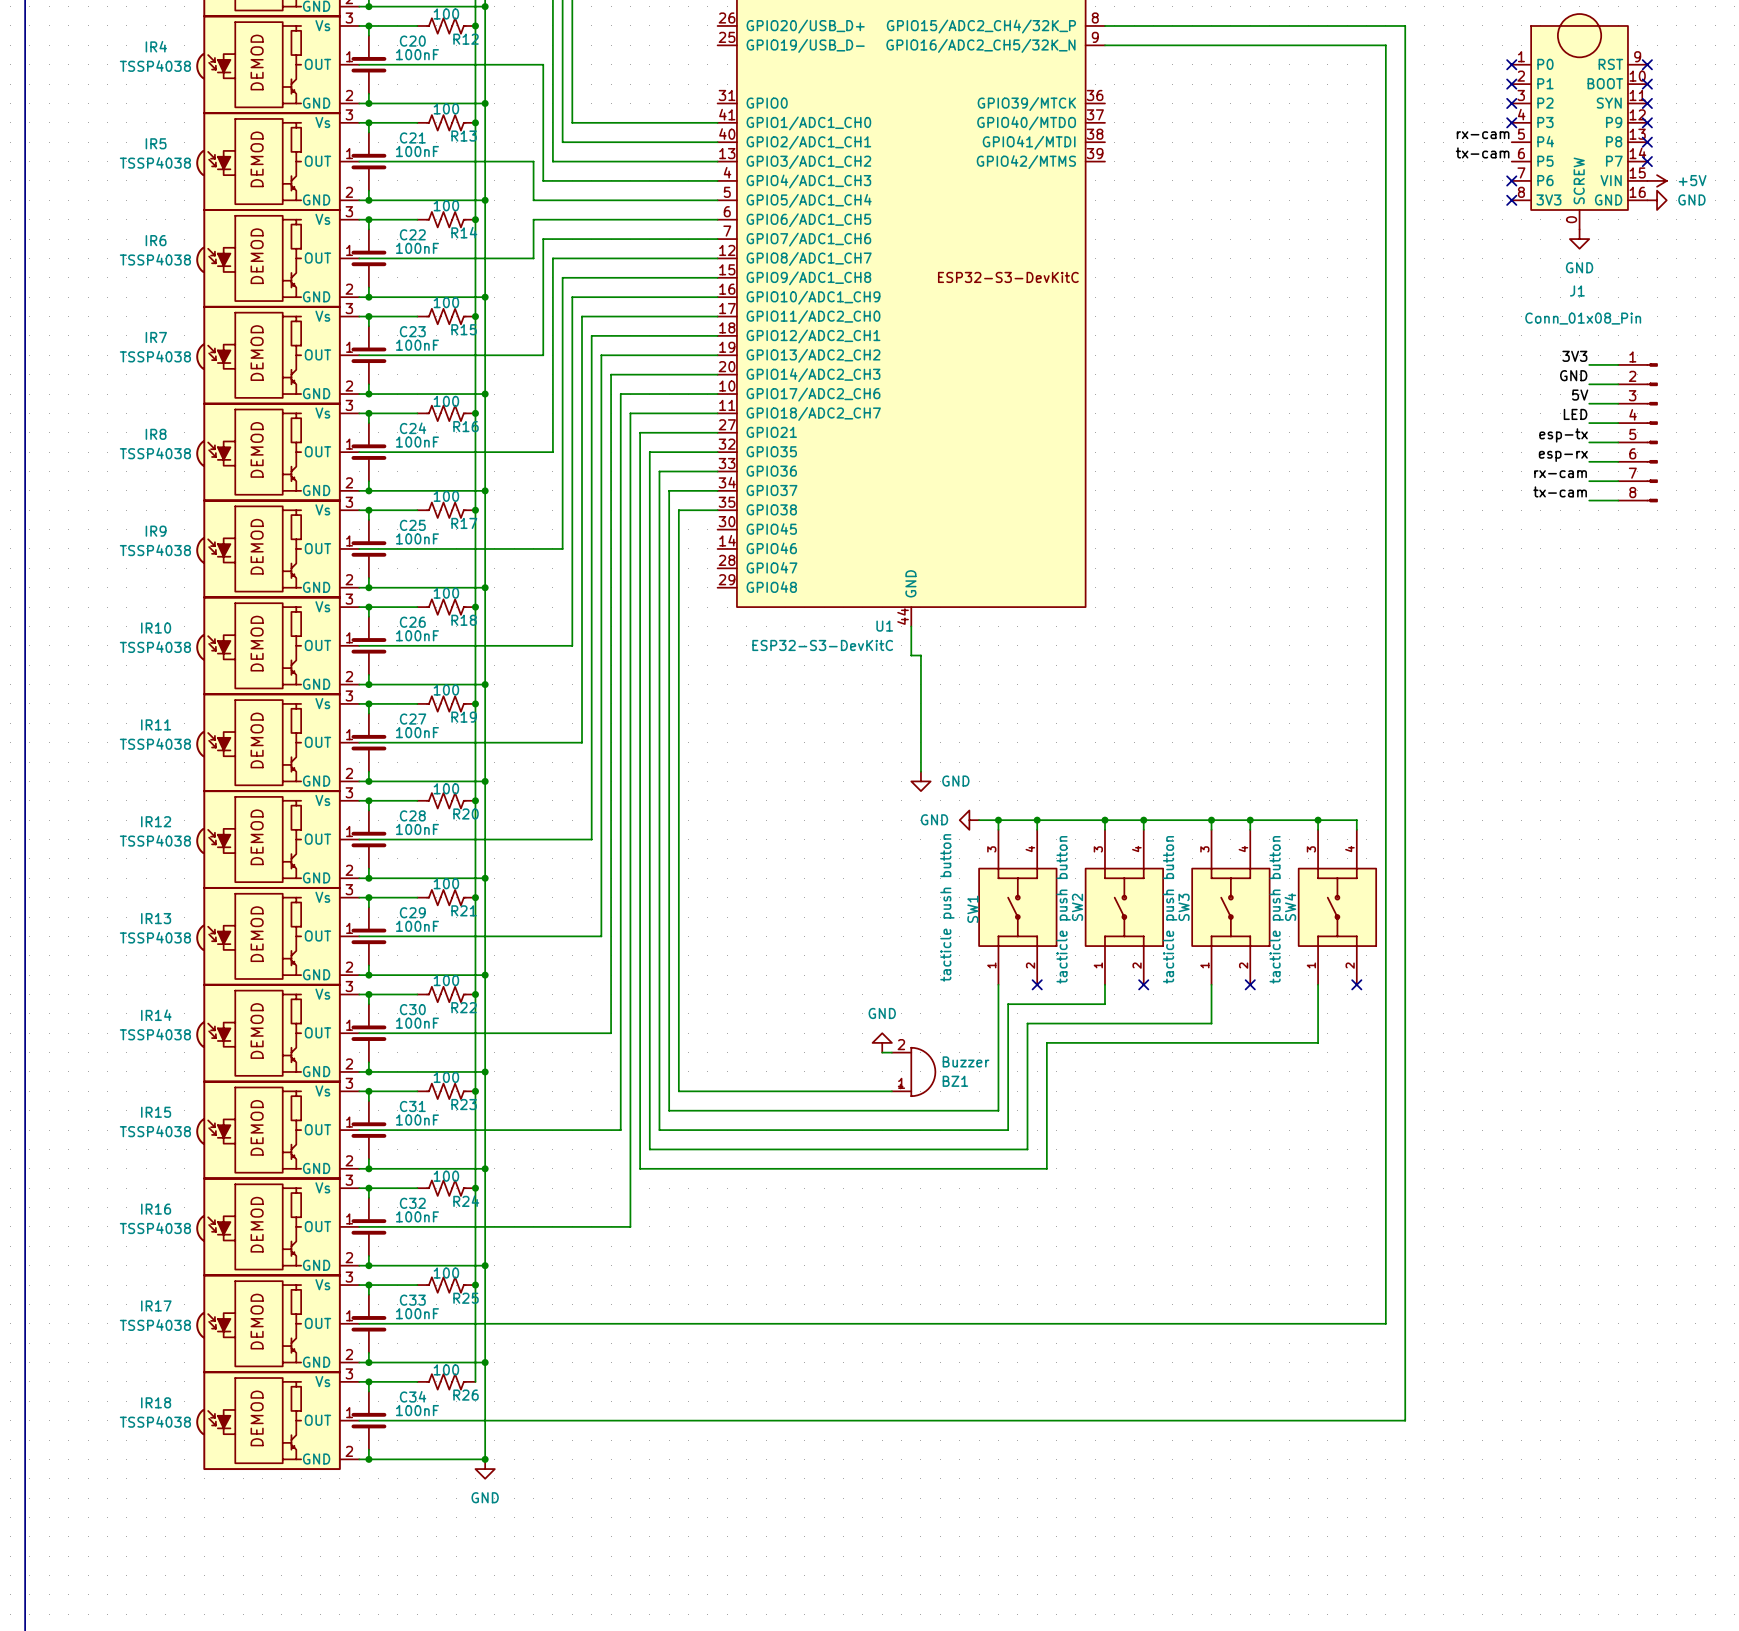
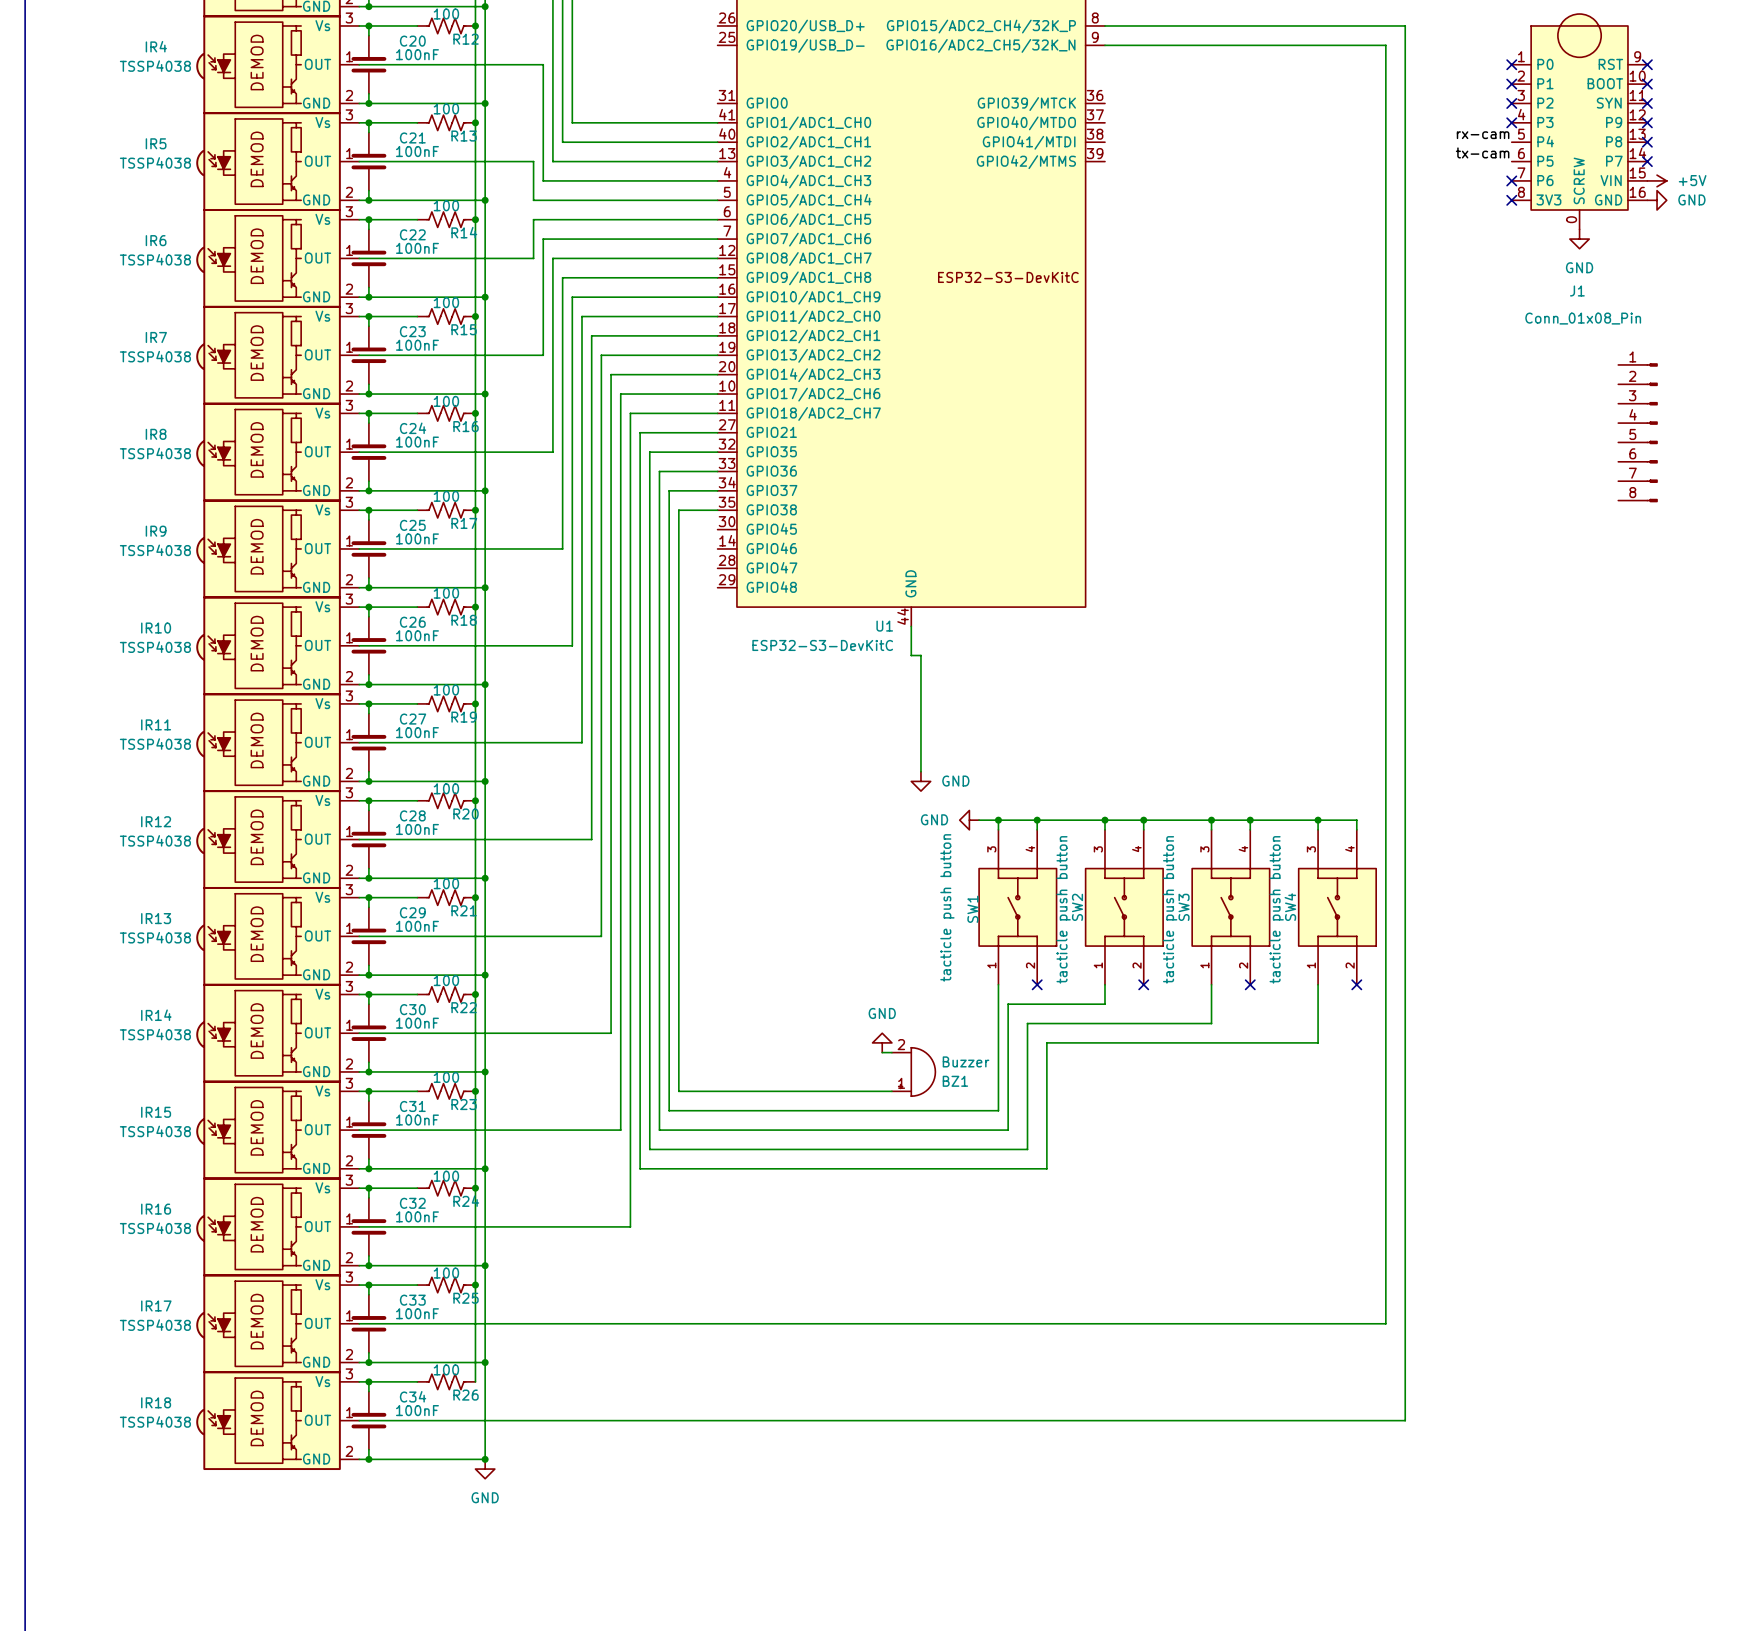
label: 3V3 (1574, 356) -> none
wire: (1589, 364) (1618, 364) -> none
label: GND (1573, 375) -> none
wire: (1589, 384) (1618, 384) -> none
label: 5V (1580, 395) -> none
wire: (1589, 403) (1618, 403) -> none
label: LED (1575, 414) -> none
wire: (1589, 423) (1618, 423) -> none
label: esp-tx (1563, 435) -> none
wire: (1589, 442) (1618, 442) -> none
label: esp-rx (1563, 456) -> none
wire: (1589, 461) (1618, 461) -> none
label: rx-cam (1560, 474) -> none
wire: (1589, 481) (1618, 481) -> none
label: tx-cam (1560, 491) -> none
wire: (1589, 500) (1618, 500) -> none

